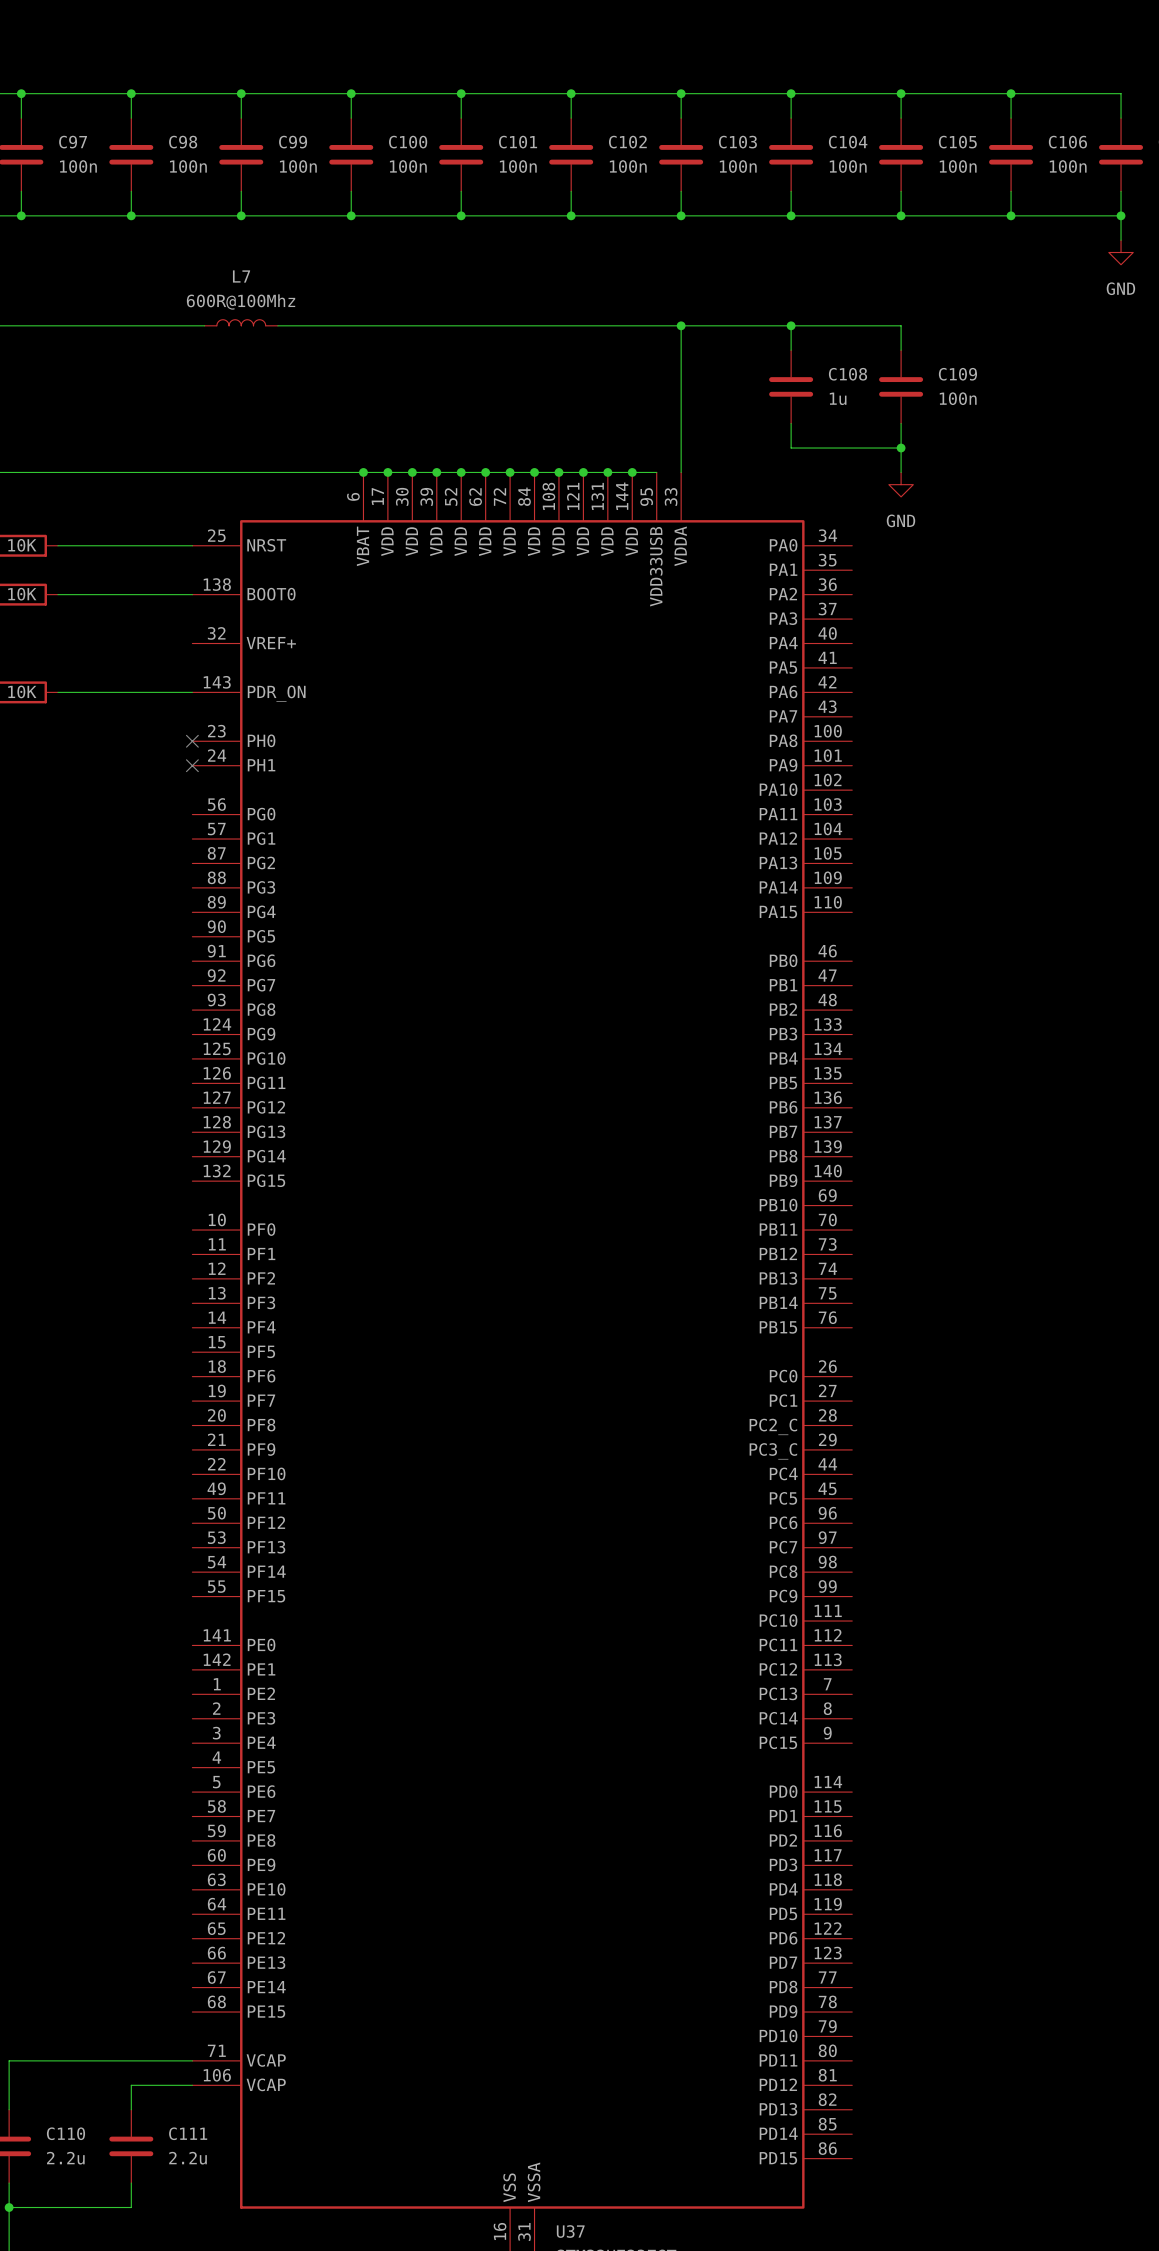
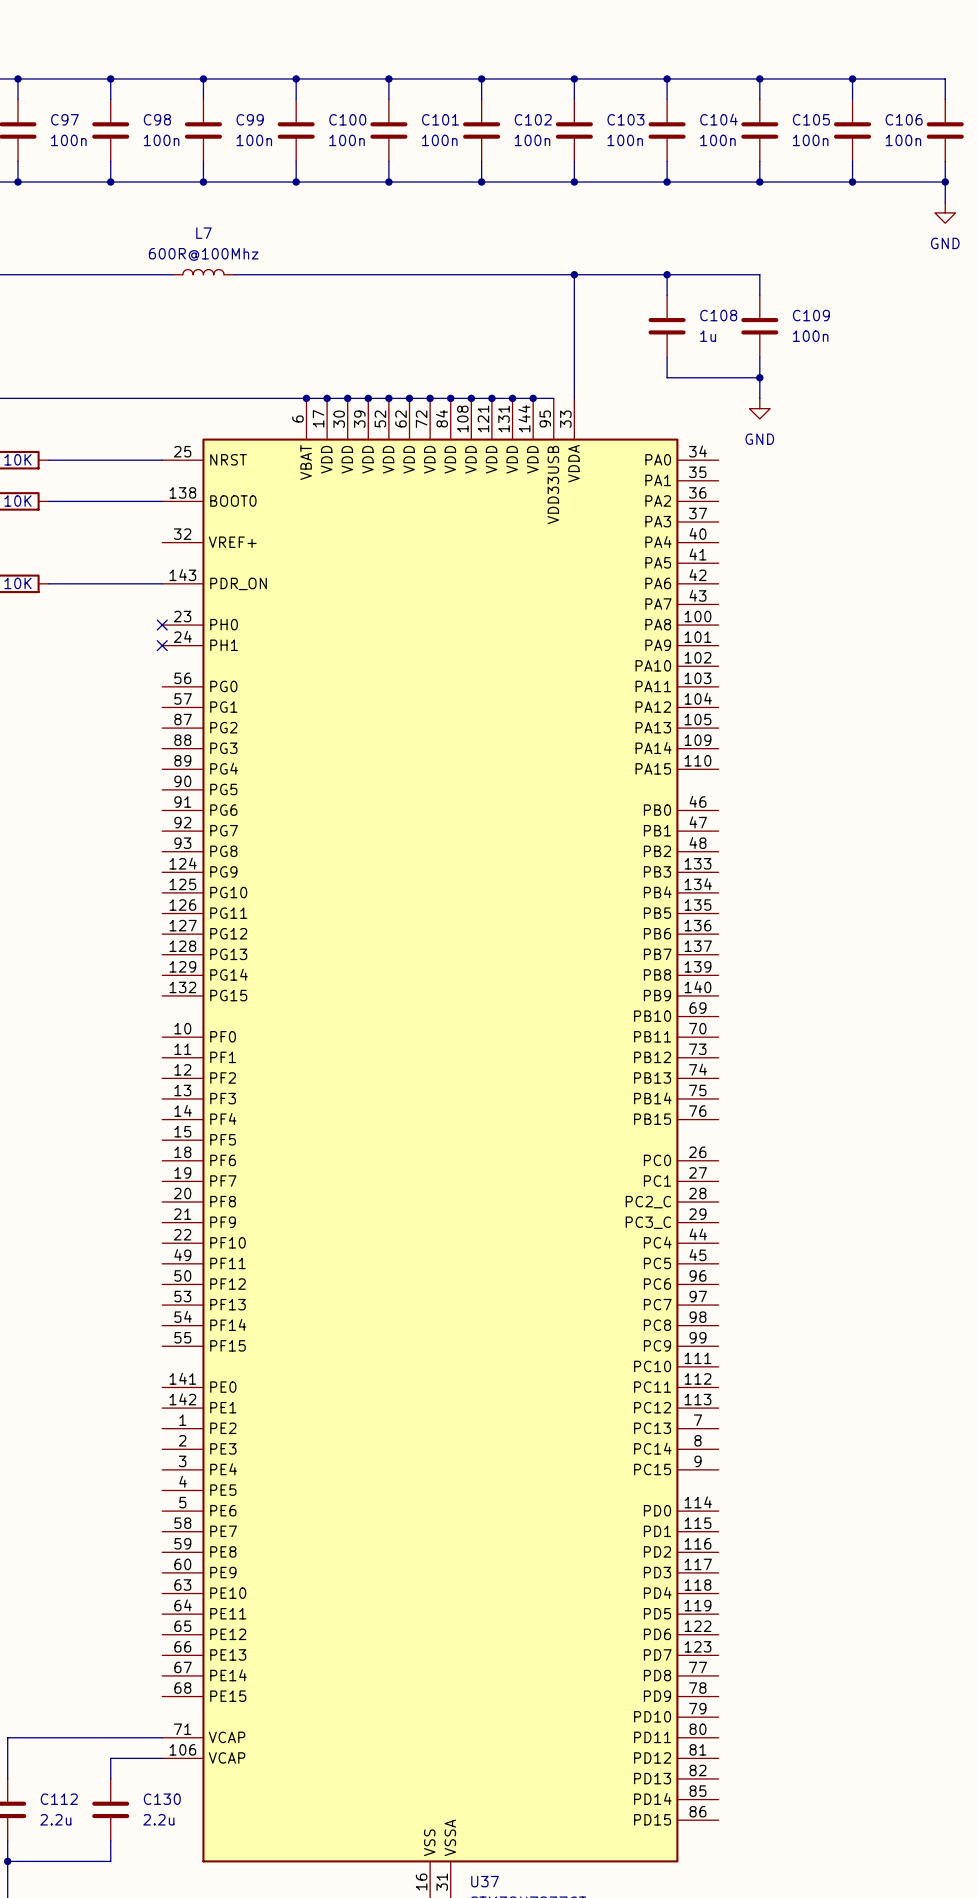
C110 name: C110 (65, 2133) -> C112 (59, 1799)
C111 name: C111 (188, 2133) -> C130 (162, 1799)

